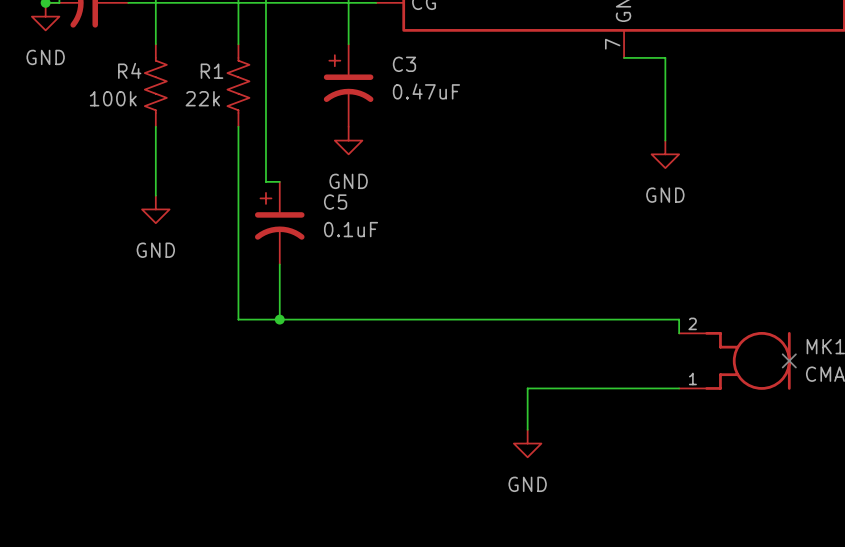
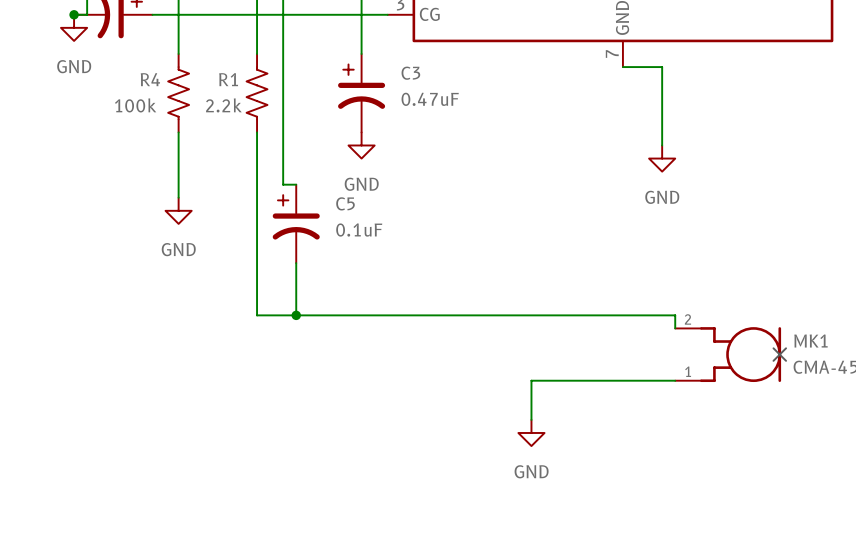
R1 value: 22k (202, 98) -> 2.2k (223, 105)

